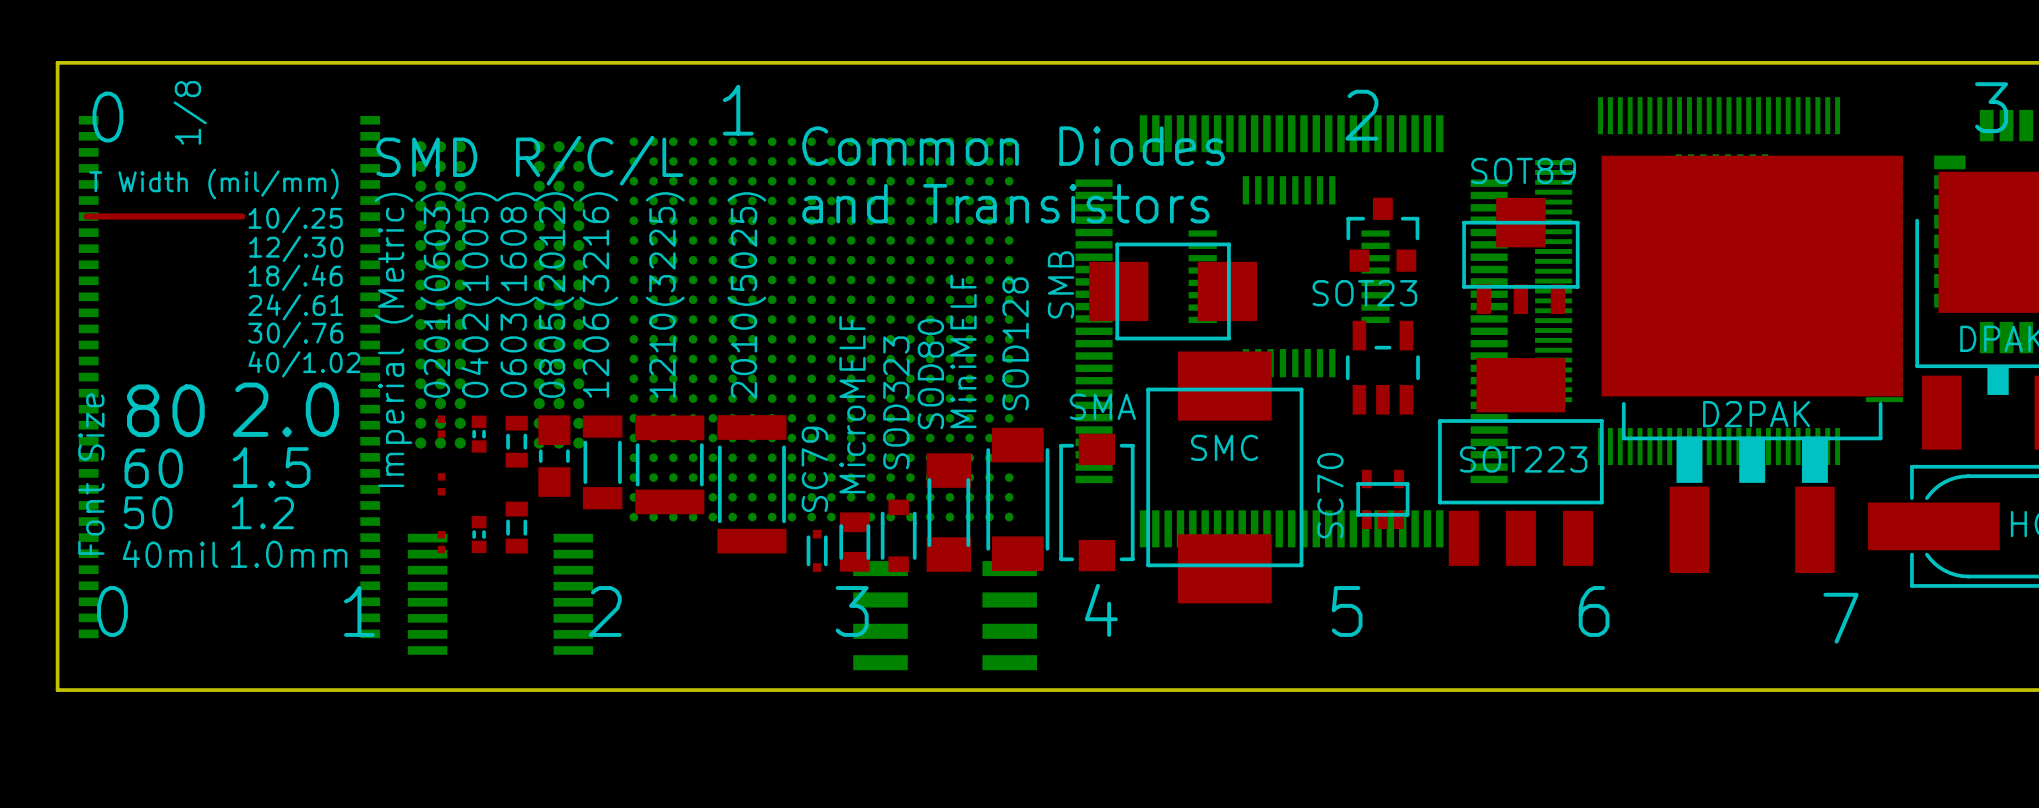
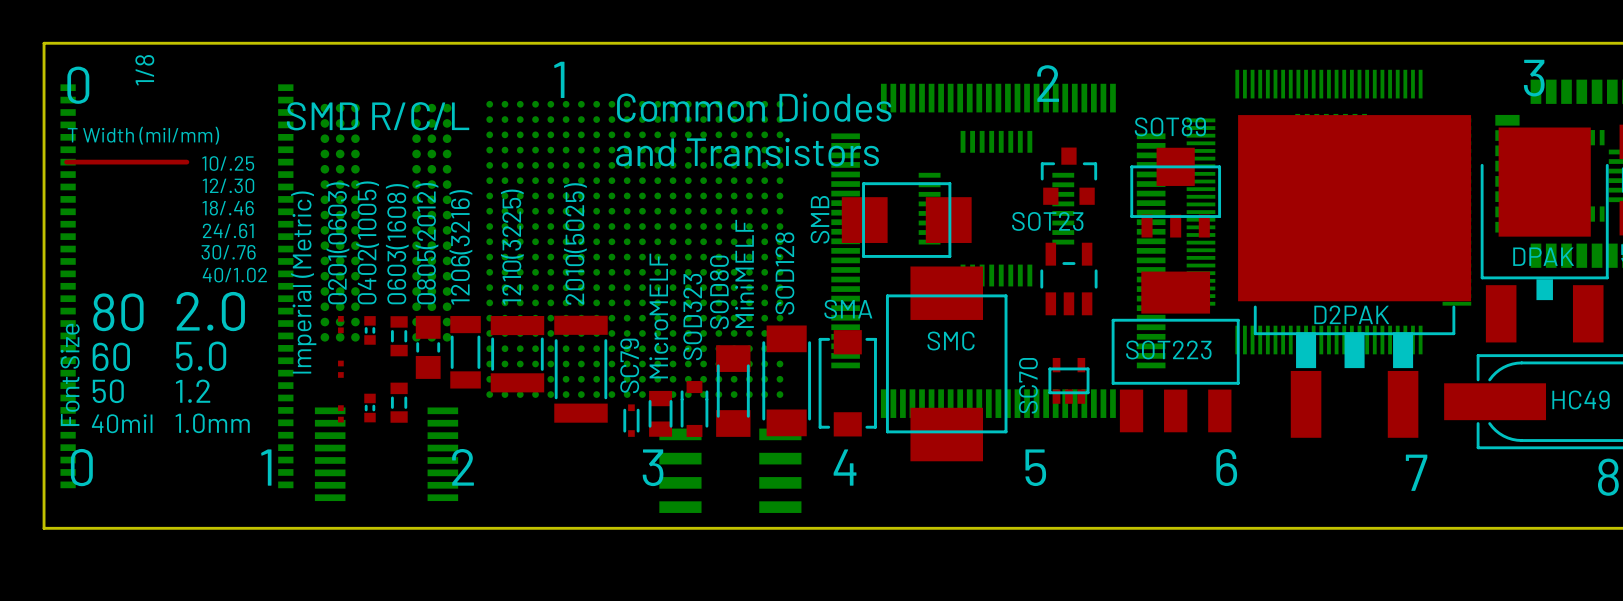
text: 1.5 (271, 467) -> 5.0 (201, 356)

